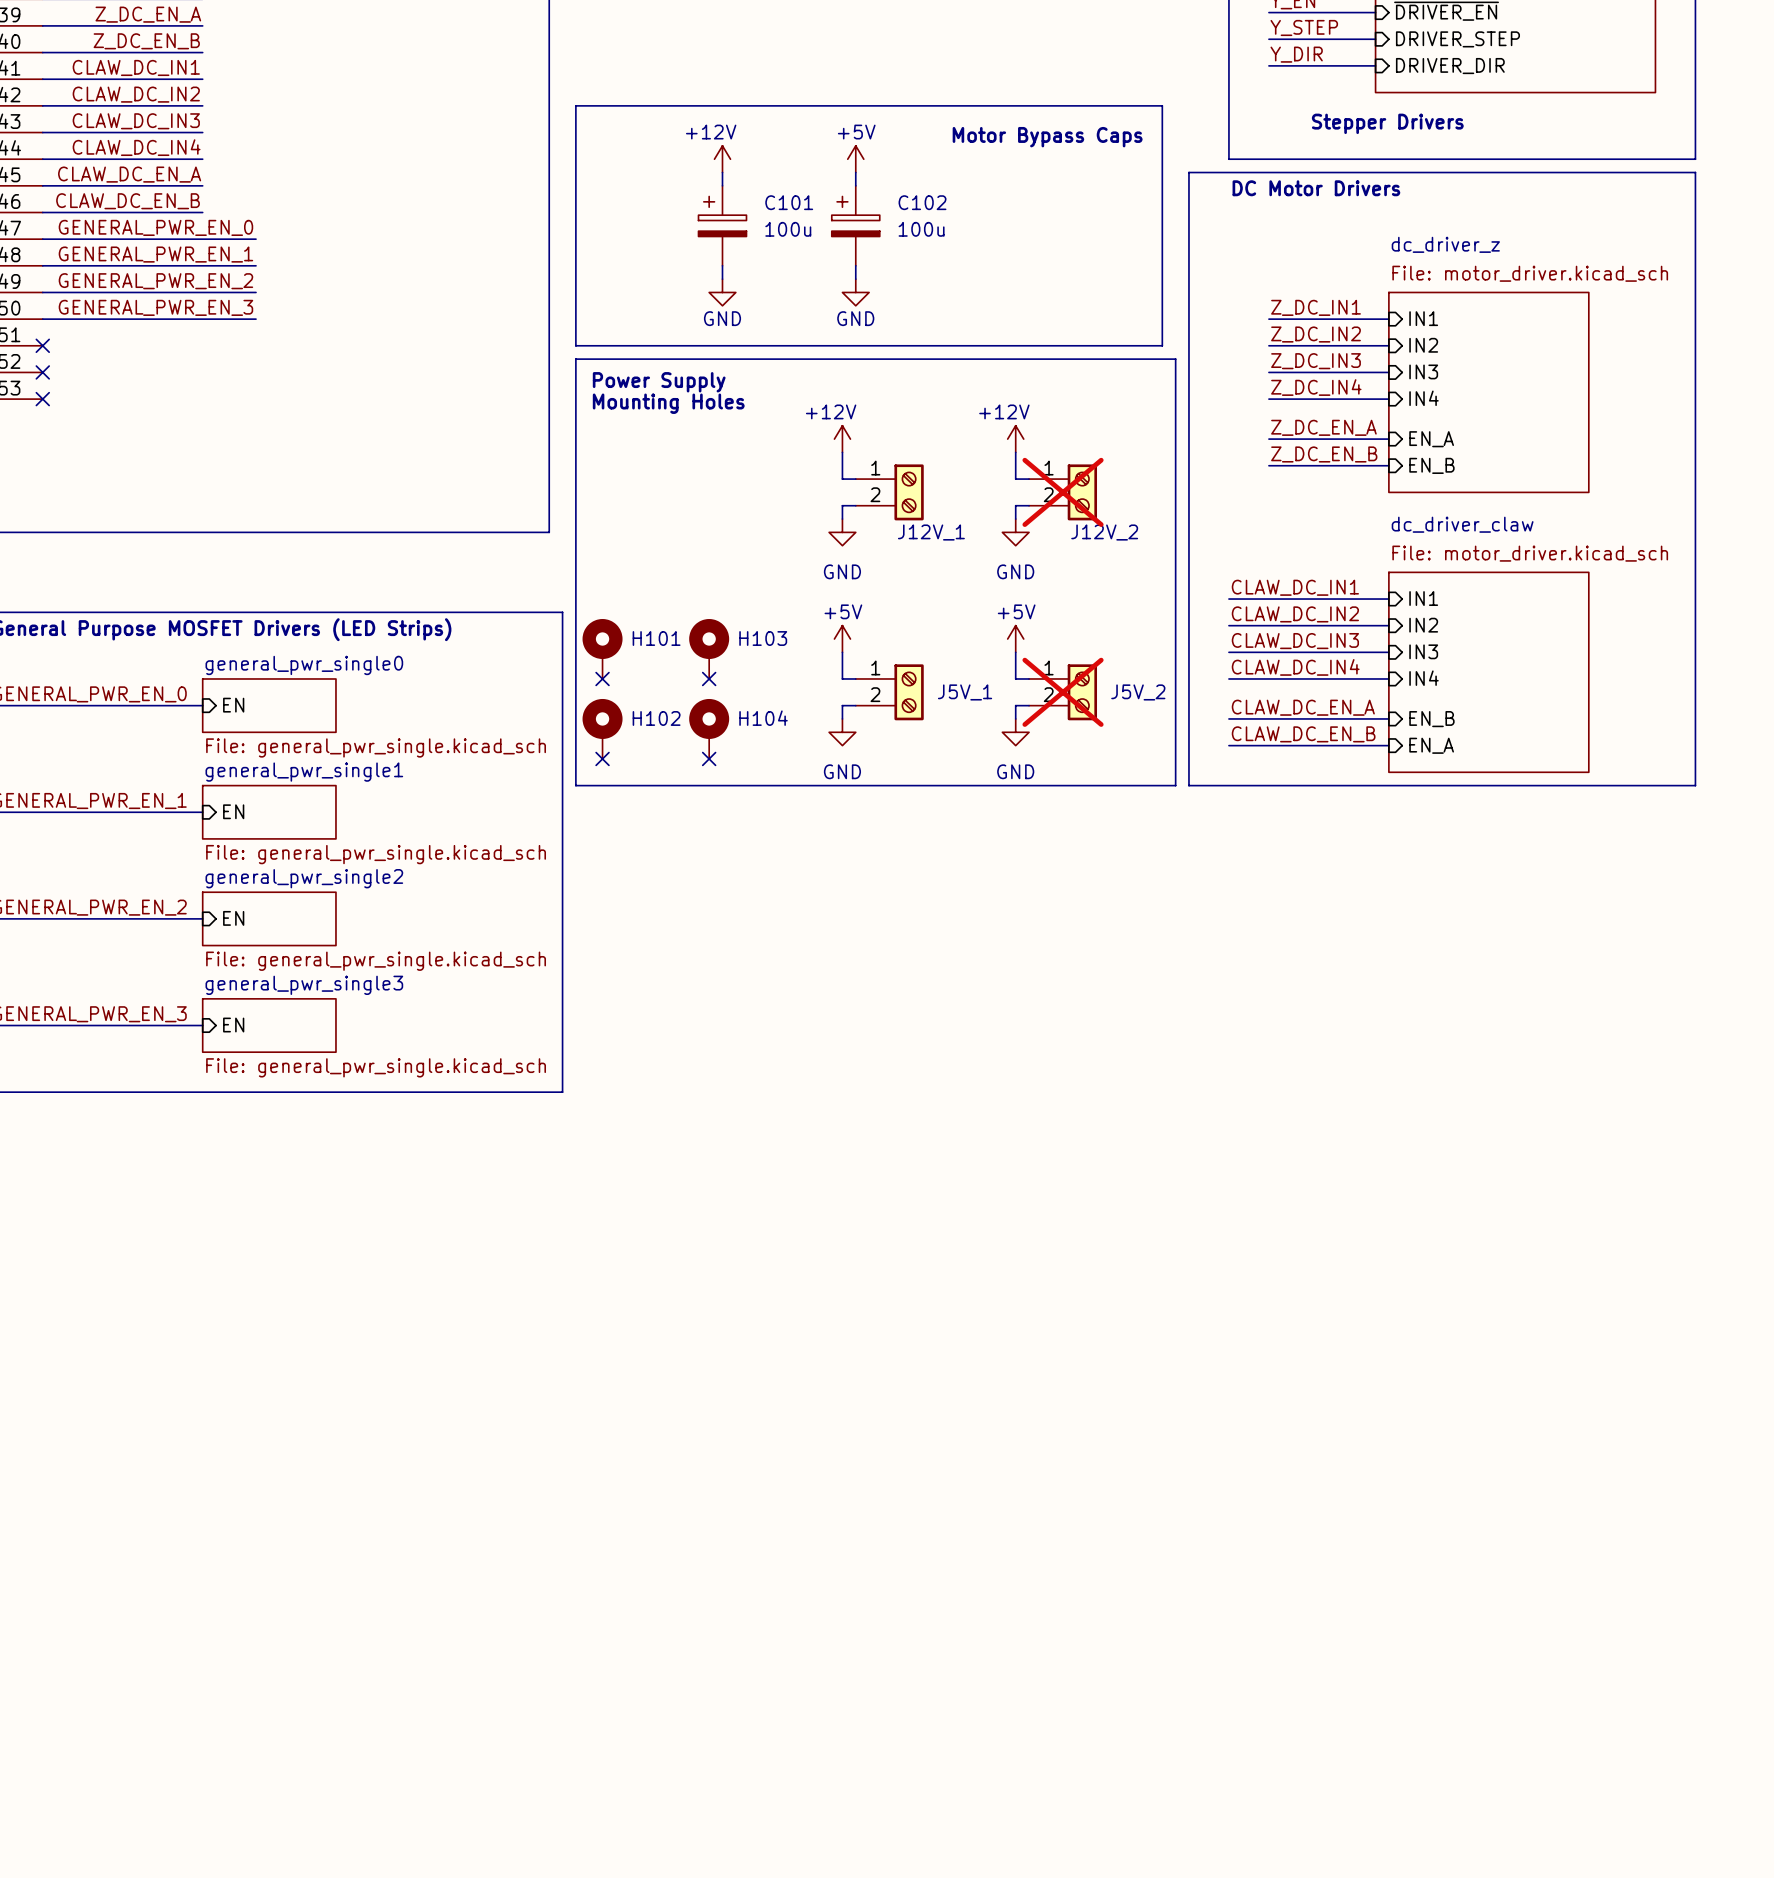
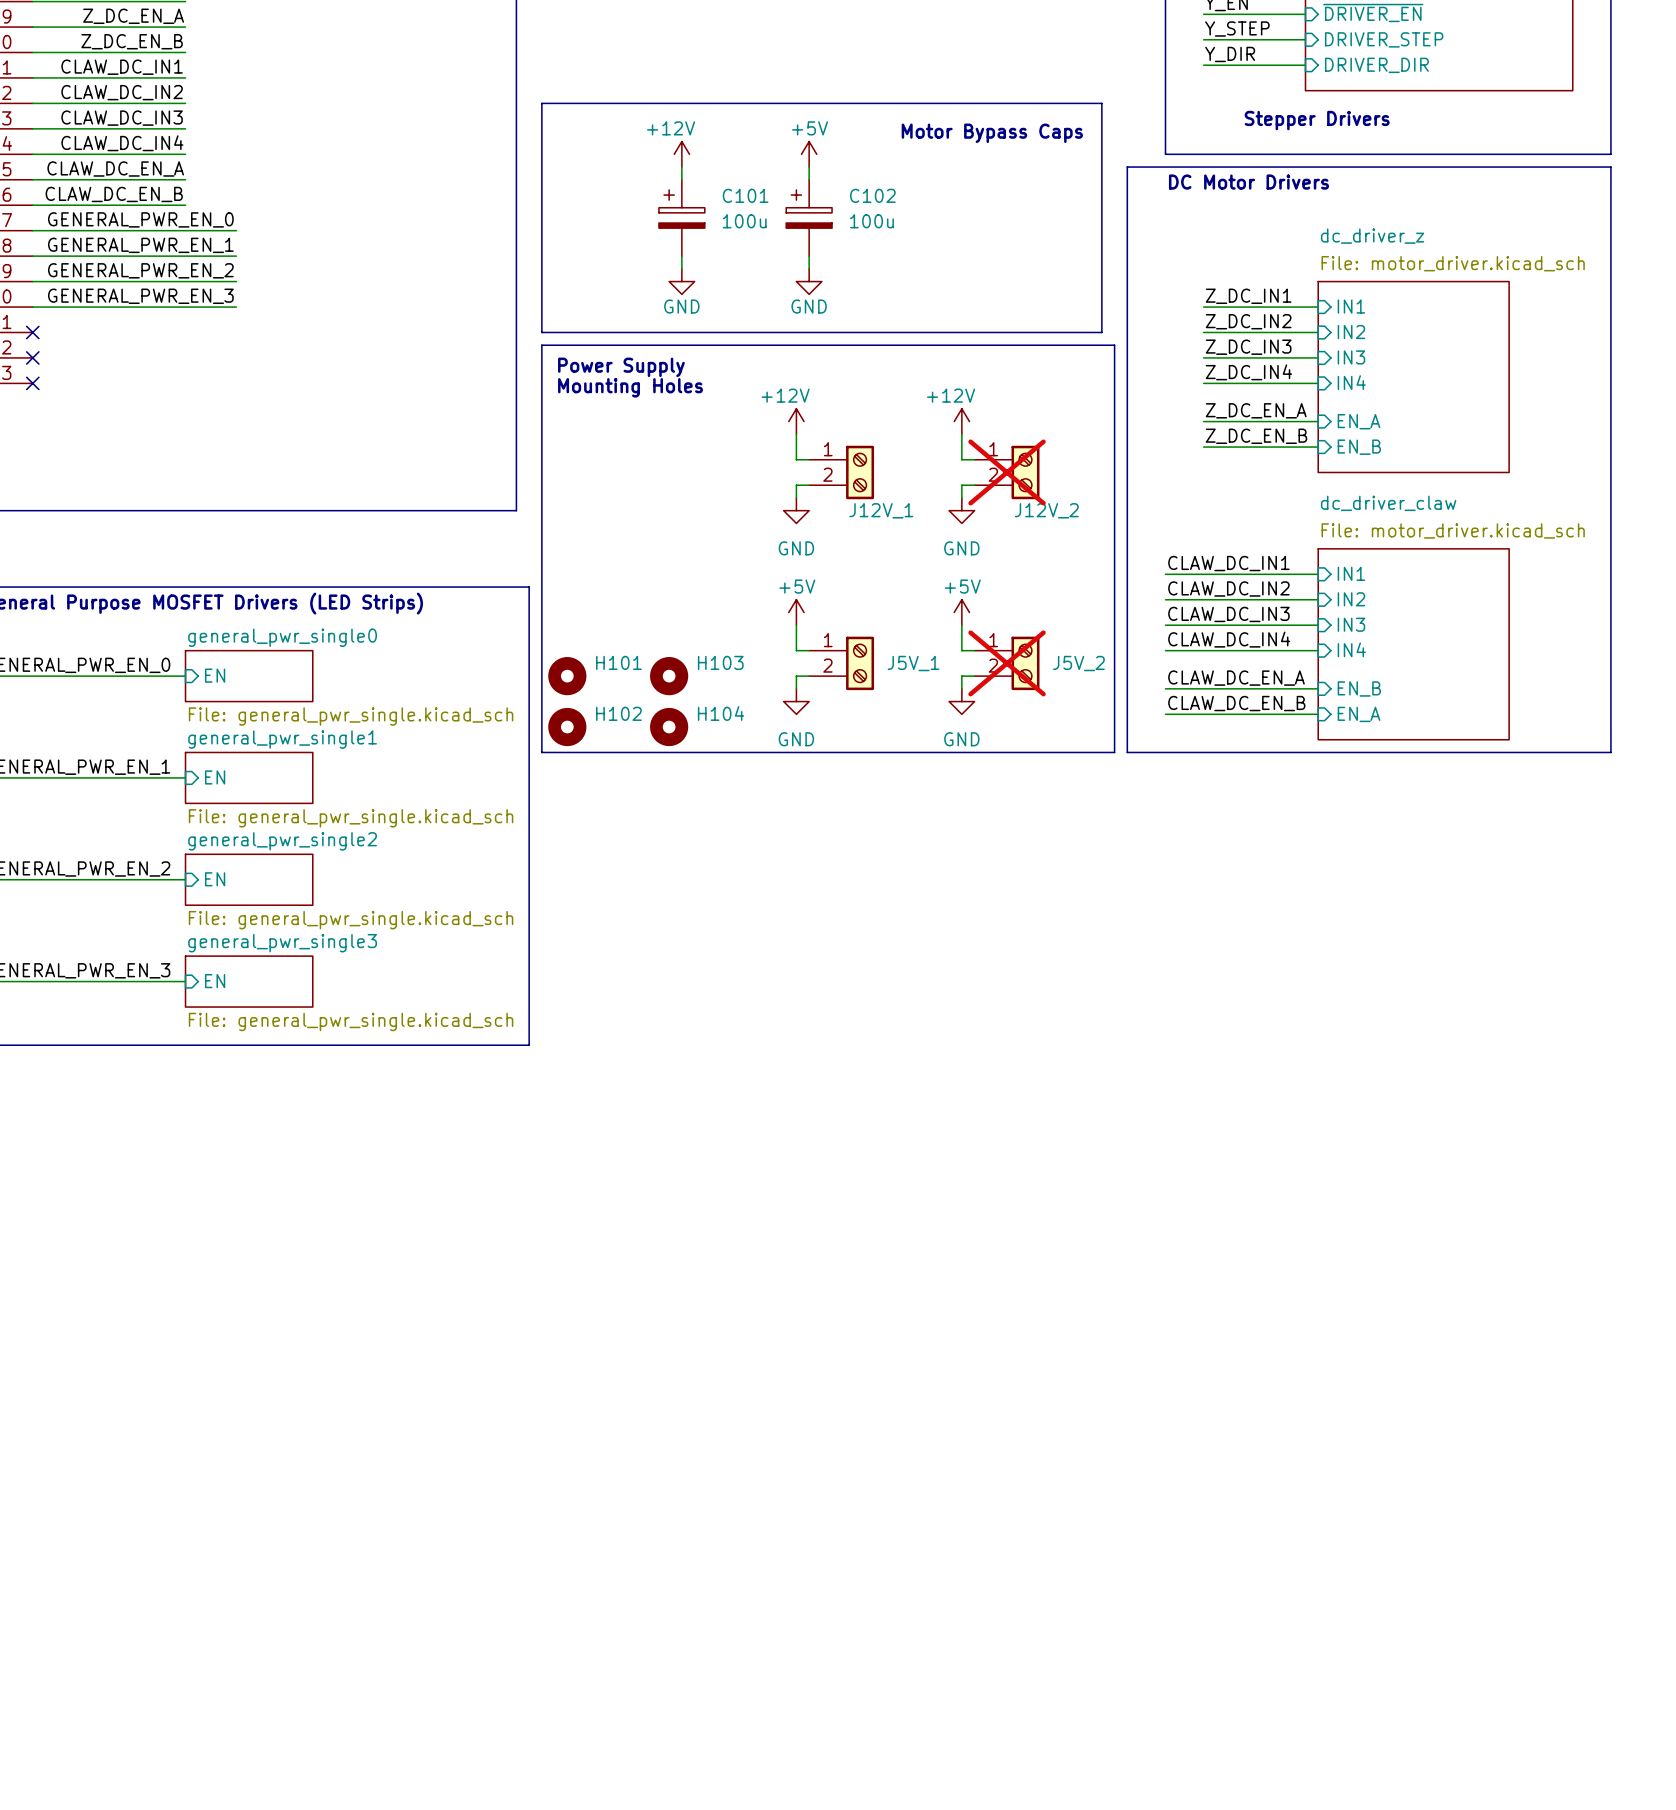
H101 symbol: [582, 619, 623, 679] -> [548, 657, 587, 696]
H103 symbol: [689, 619, 730, 679] -> [650, 657, 689, 696]
no-connect mark: (602, 678) -> none
no-connect mark: (709, 678) -> none
H102 symbol: [582, 698, 623, 759] -> [548, 707, 587, 747]
H104 symbol: [689, 698, 730, 759] -> [650, 707, 689, 747]
no-connect mark: (602, 758) -> none
no-connect mark: (709, 758) -> none

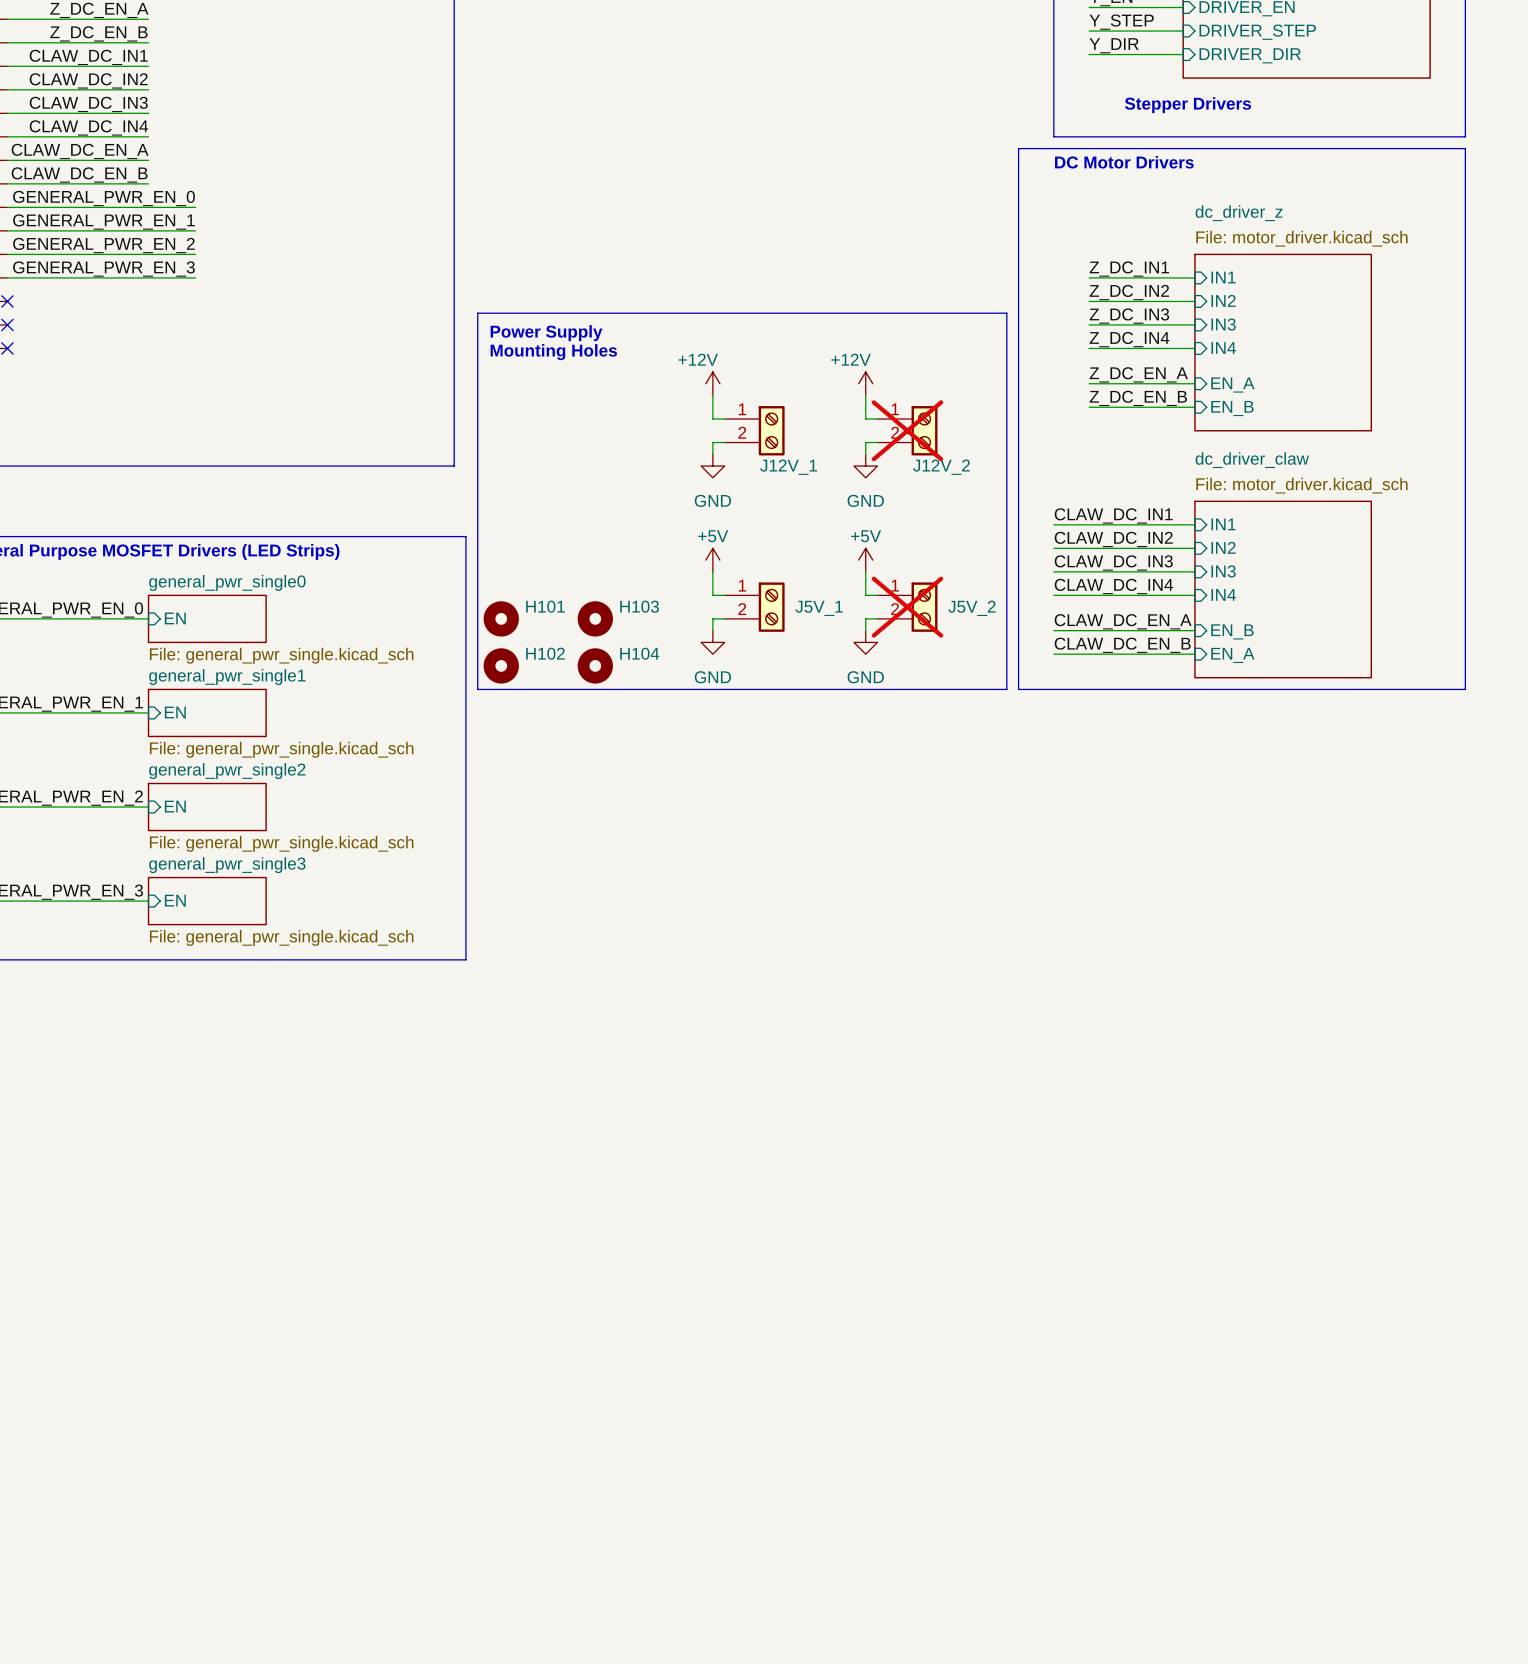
line: (541, 103) (1101, 103) (1101, 332) (541, 332) (541, 103) -> none
text: Motor Bypass Caps (992, 133) -> none
power symbol: +12V (681, 154) -> none
power symbol: +5V (809, 154) -> none
wire: (681, 167) (681, 179) -> none
wire: (809, 167) (809, 179) -> none
C101: 100u (681, 217) -> none
C102: 100u (809, 217) -> none
wire: (681, 256) (681, 268) -> none
wire: (809, 256) (809, 268) -> none
power symbol: GND (681, 281) -> none
power symbol: GND (809, 281) -> none

